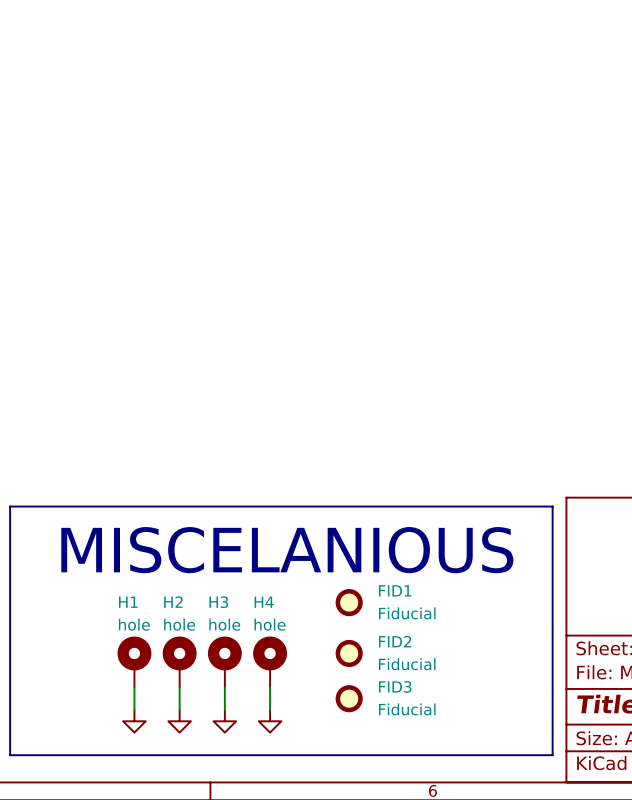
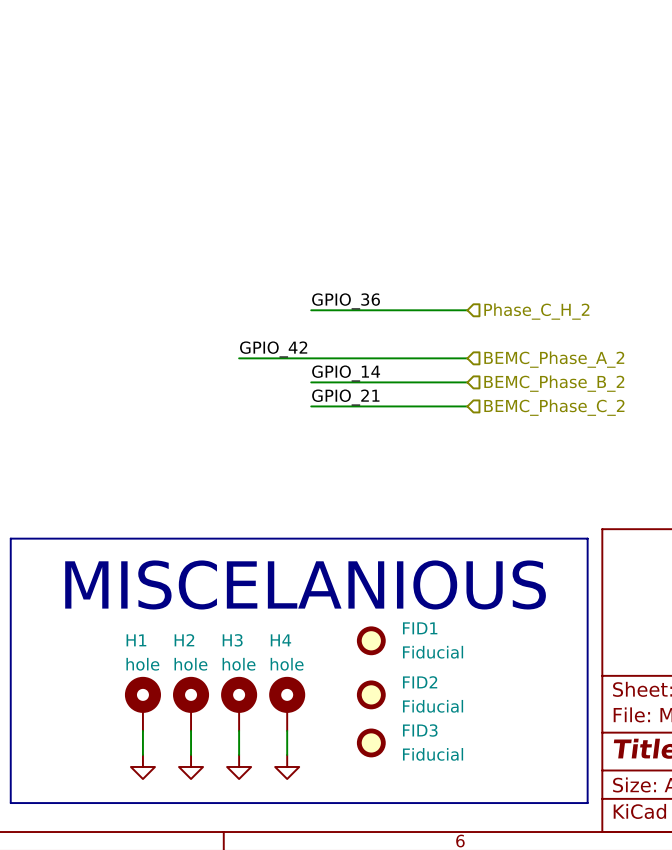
label: none -> GPIO_36 (346, 301)
wire: none -> (311, 310) (467, 310)
hierarchical label: none -> Phase_C_H_2 (536, 311)
label: none -> GPIO_42 (273, 349)
wire: none -> (239, 358) (467, 358)
hierarchical label: none -> BEMC_Phase_A_2 (554, 359)
label: none -> GPIO_14 (346, 373)
wire: none -> (311, 382) (467, 382)
hierarchical label: none -> BEMC_Phase_B_2 (554, 383)
label: none -> GPIO_21 (345, 397)
wire: none -> (311, 406) (467, 406)
hierarchical label: none -> BEMC_Phase_C_2 (554, 407)

